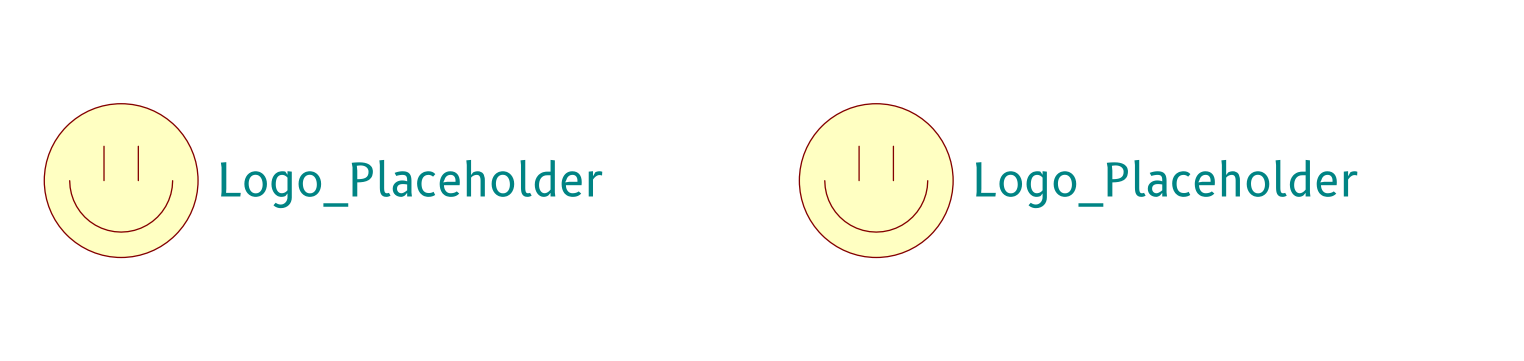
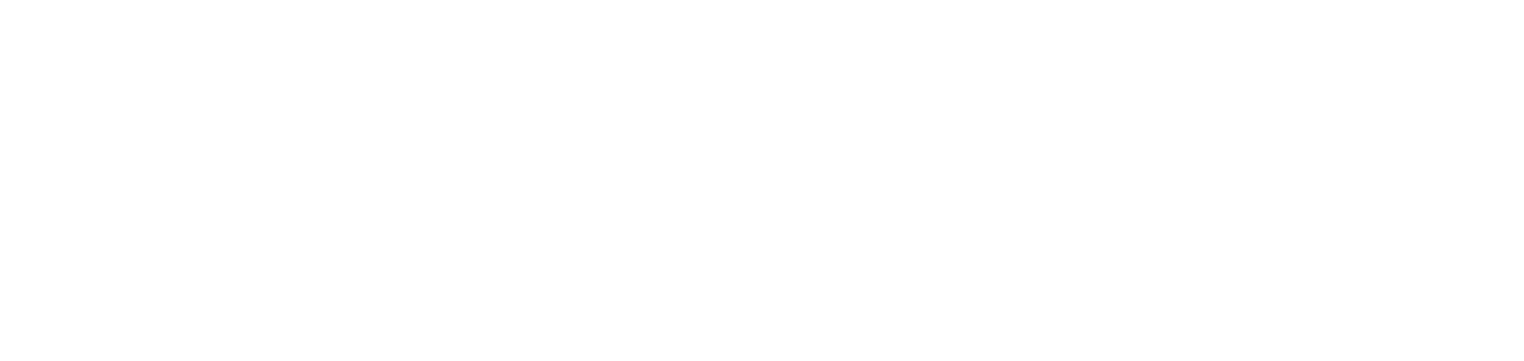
part: Logo_Placeholder (121, 180) -> none
part: Logo_Placeholder (876, 180) -> none

